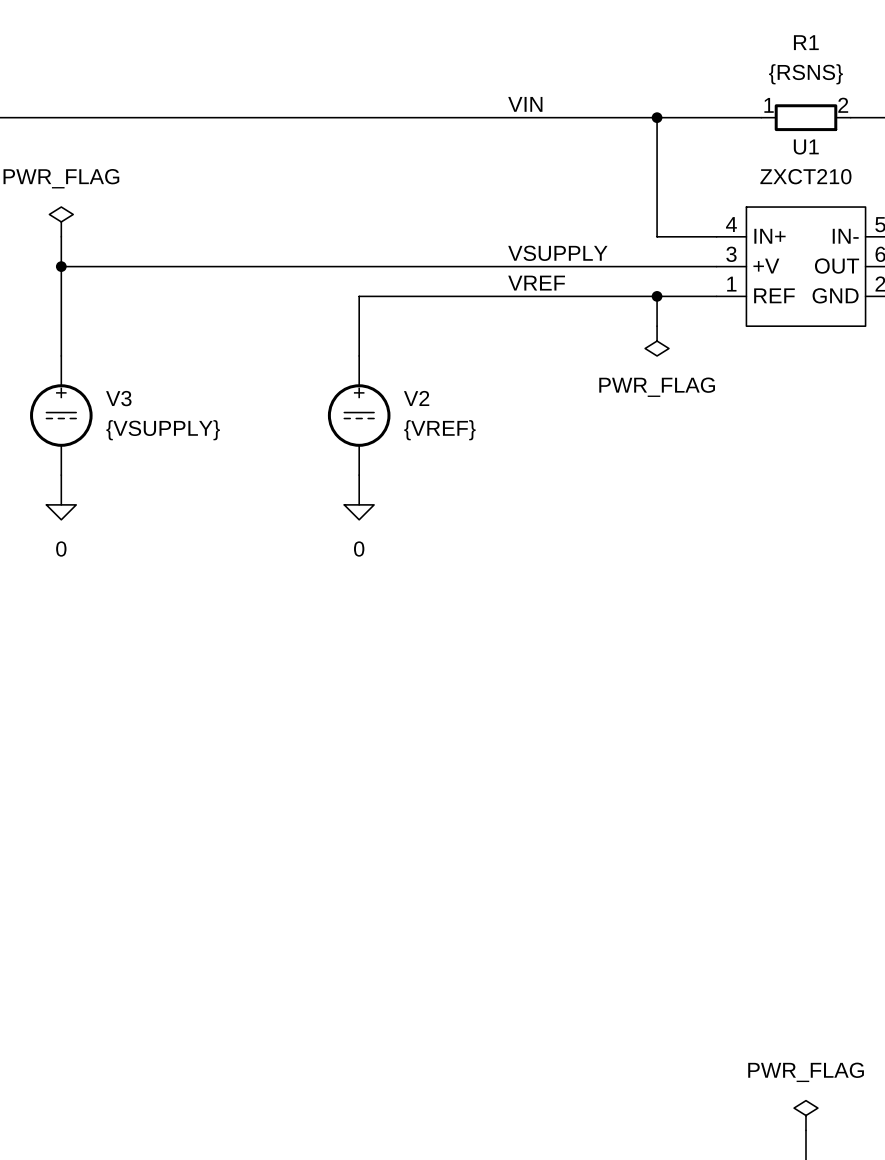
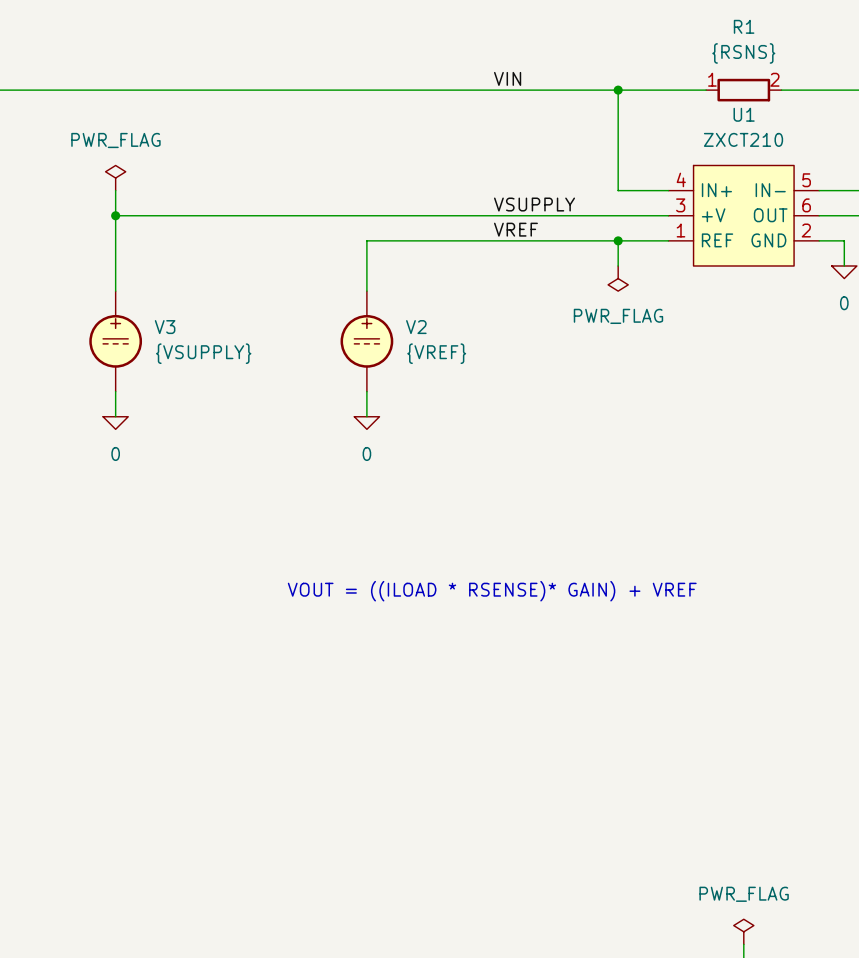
text: none -> VOUT = ((ILOAD * RSENSE)* GAIN) + VREF (492, 591)

